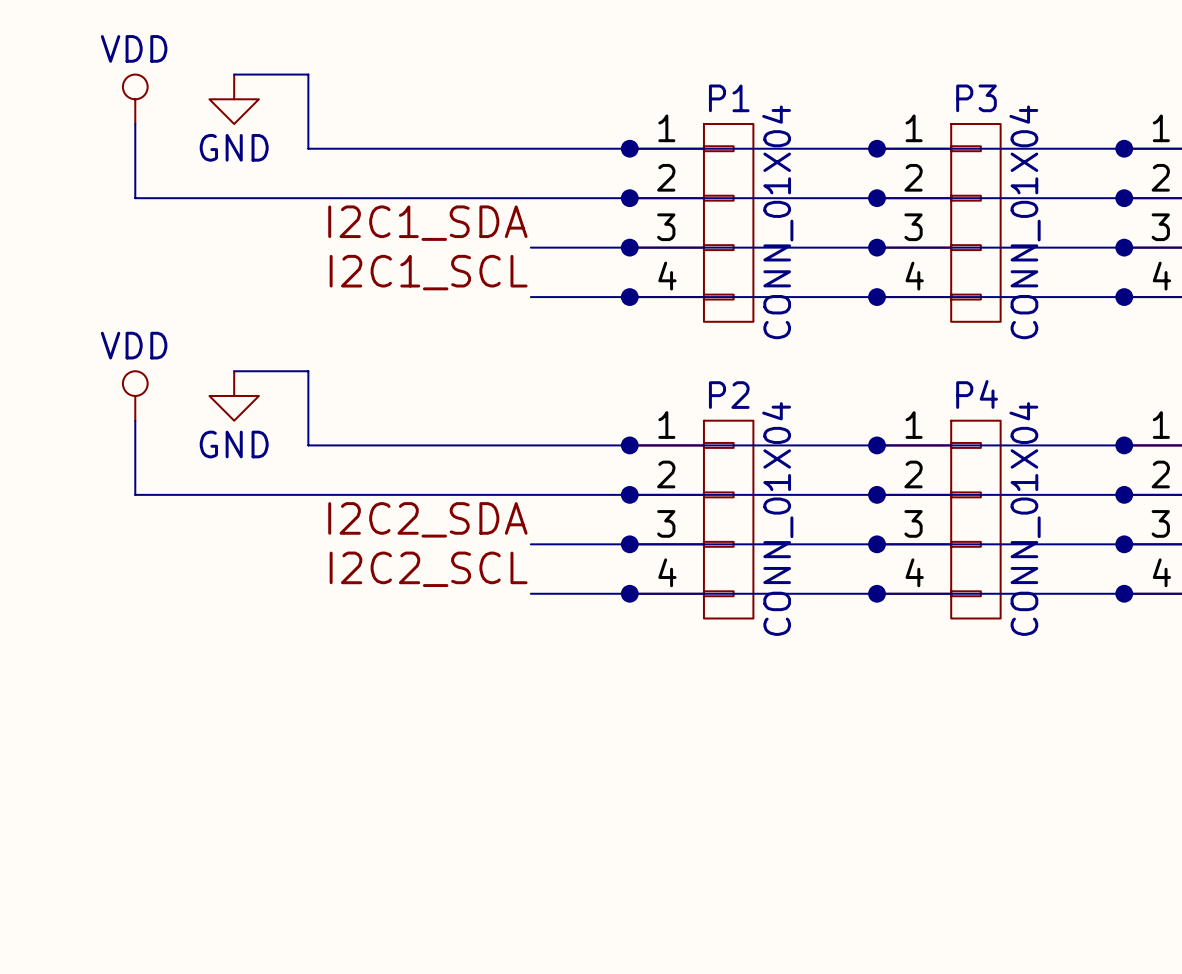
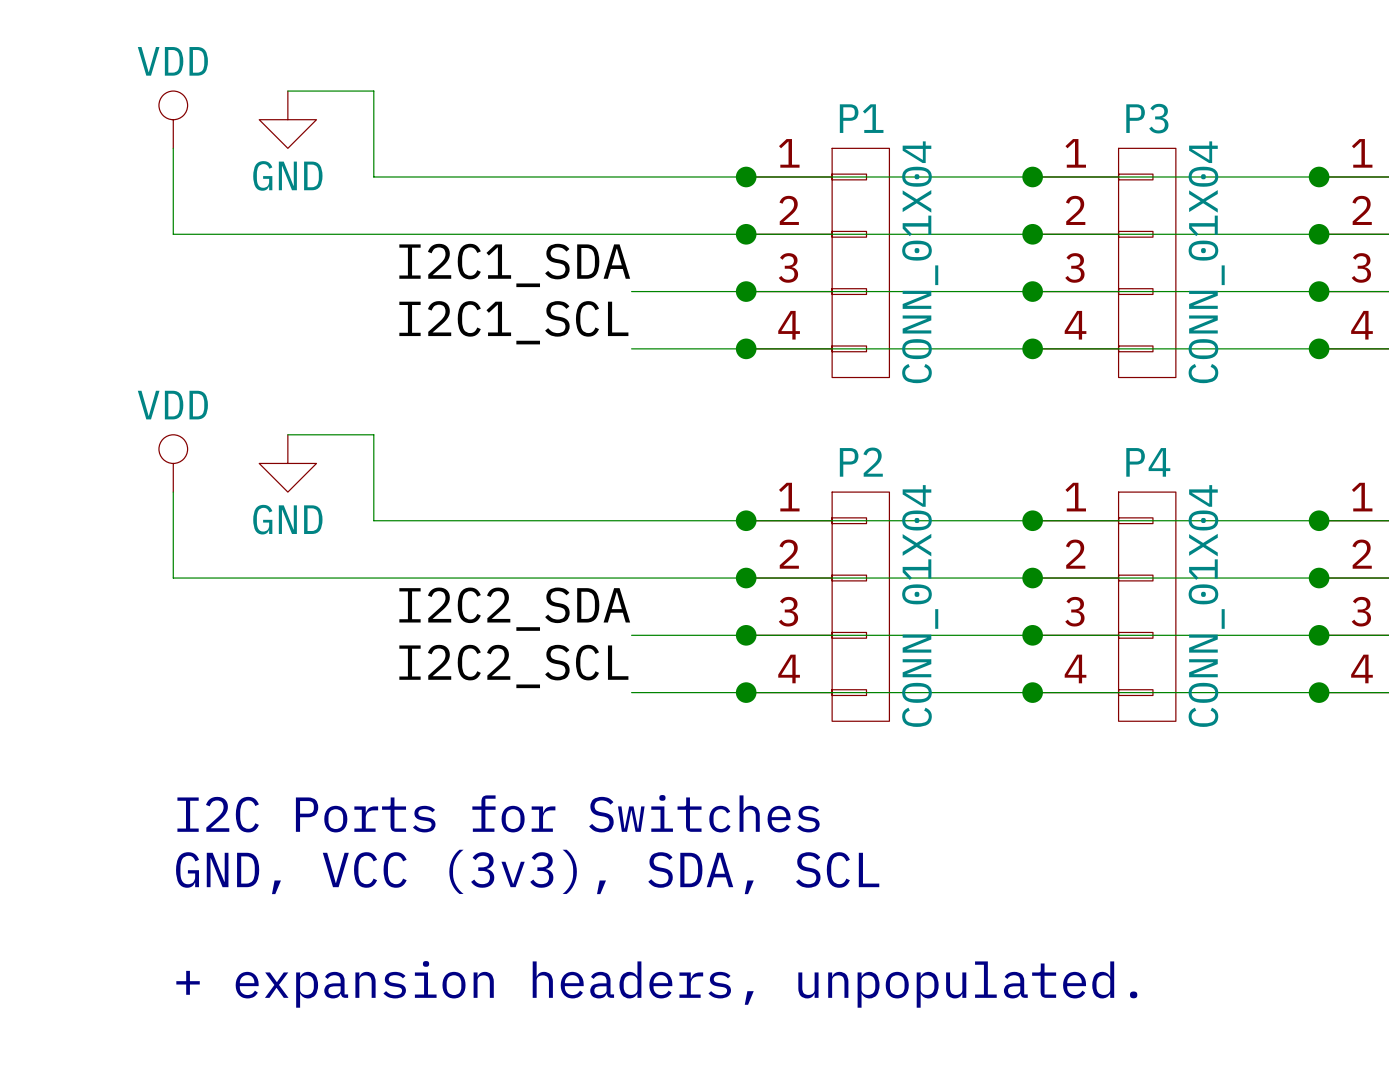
text: none -> I2C Ports for Switches (498, 813)
text: none -> GND, VCC (3v3), SDA, SCL (527, 871)
text: none -> + expansion headers, unpopulated. (656, 984)

